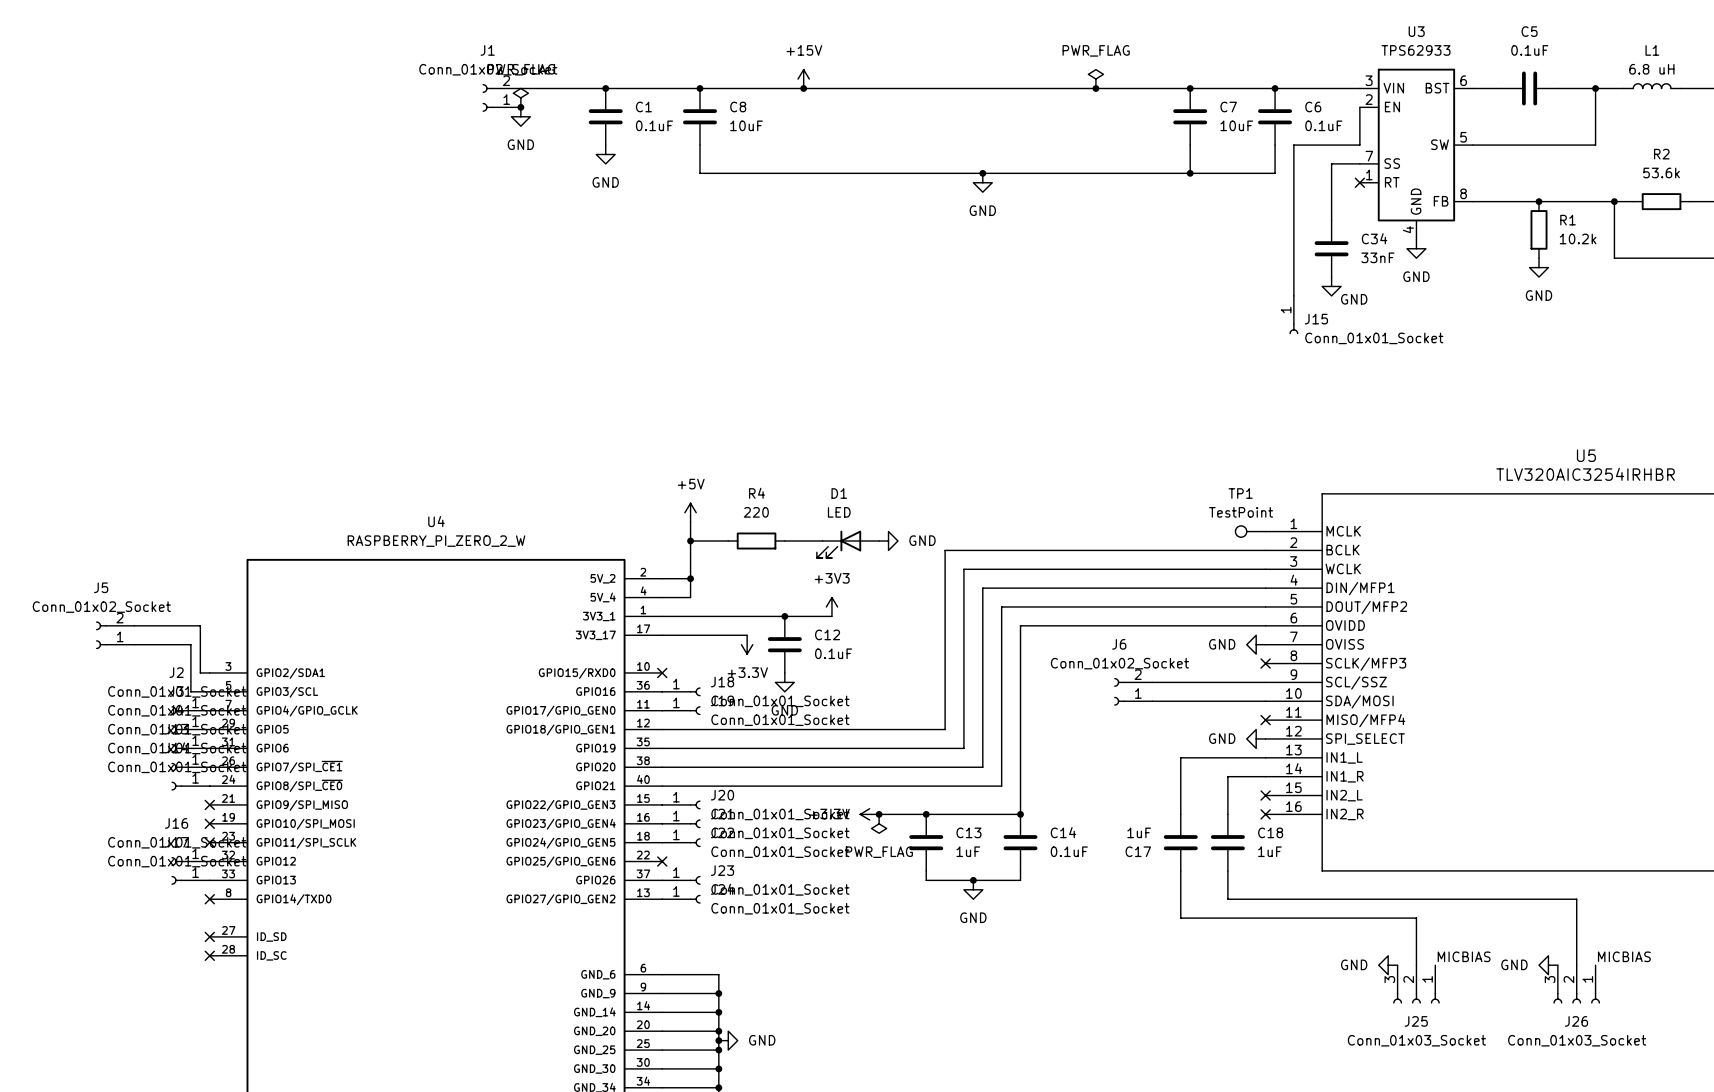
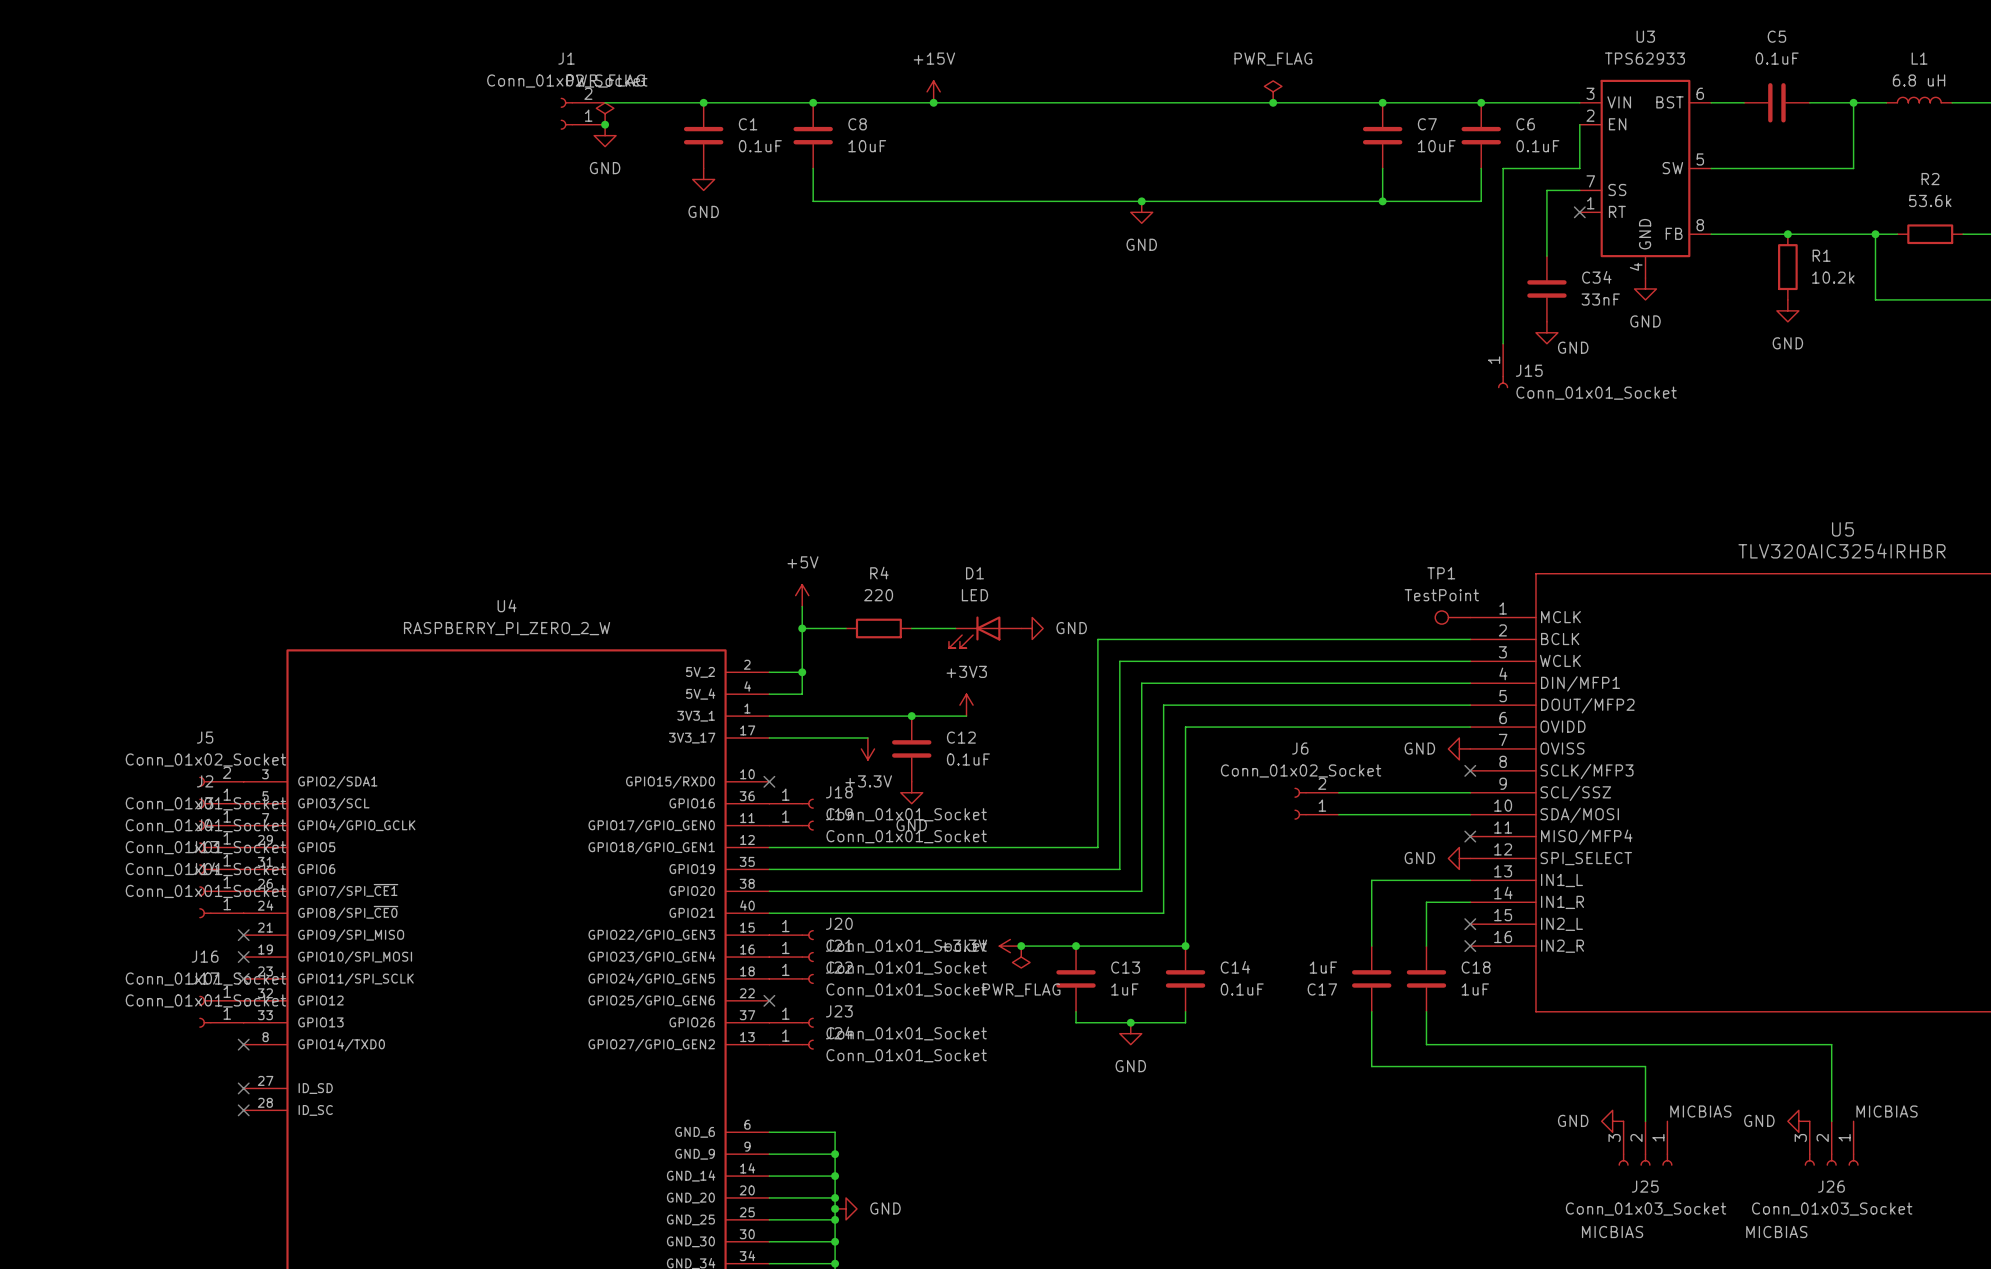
wire: (134, 625) (200, 625) (200, 672) (209, 672) -> none
J5 position: (115, 635) -> (221, 792)
wire: (134, 644) (190, 644) (190, 691) (209, 691) -> none
label: none -> MICBIAS (1612, 1232)
label: none -> MICBIAS (1776, 1232)

